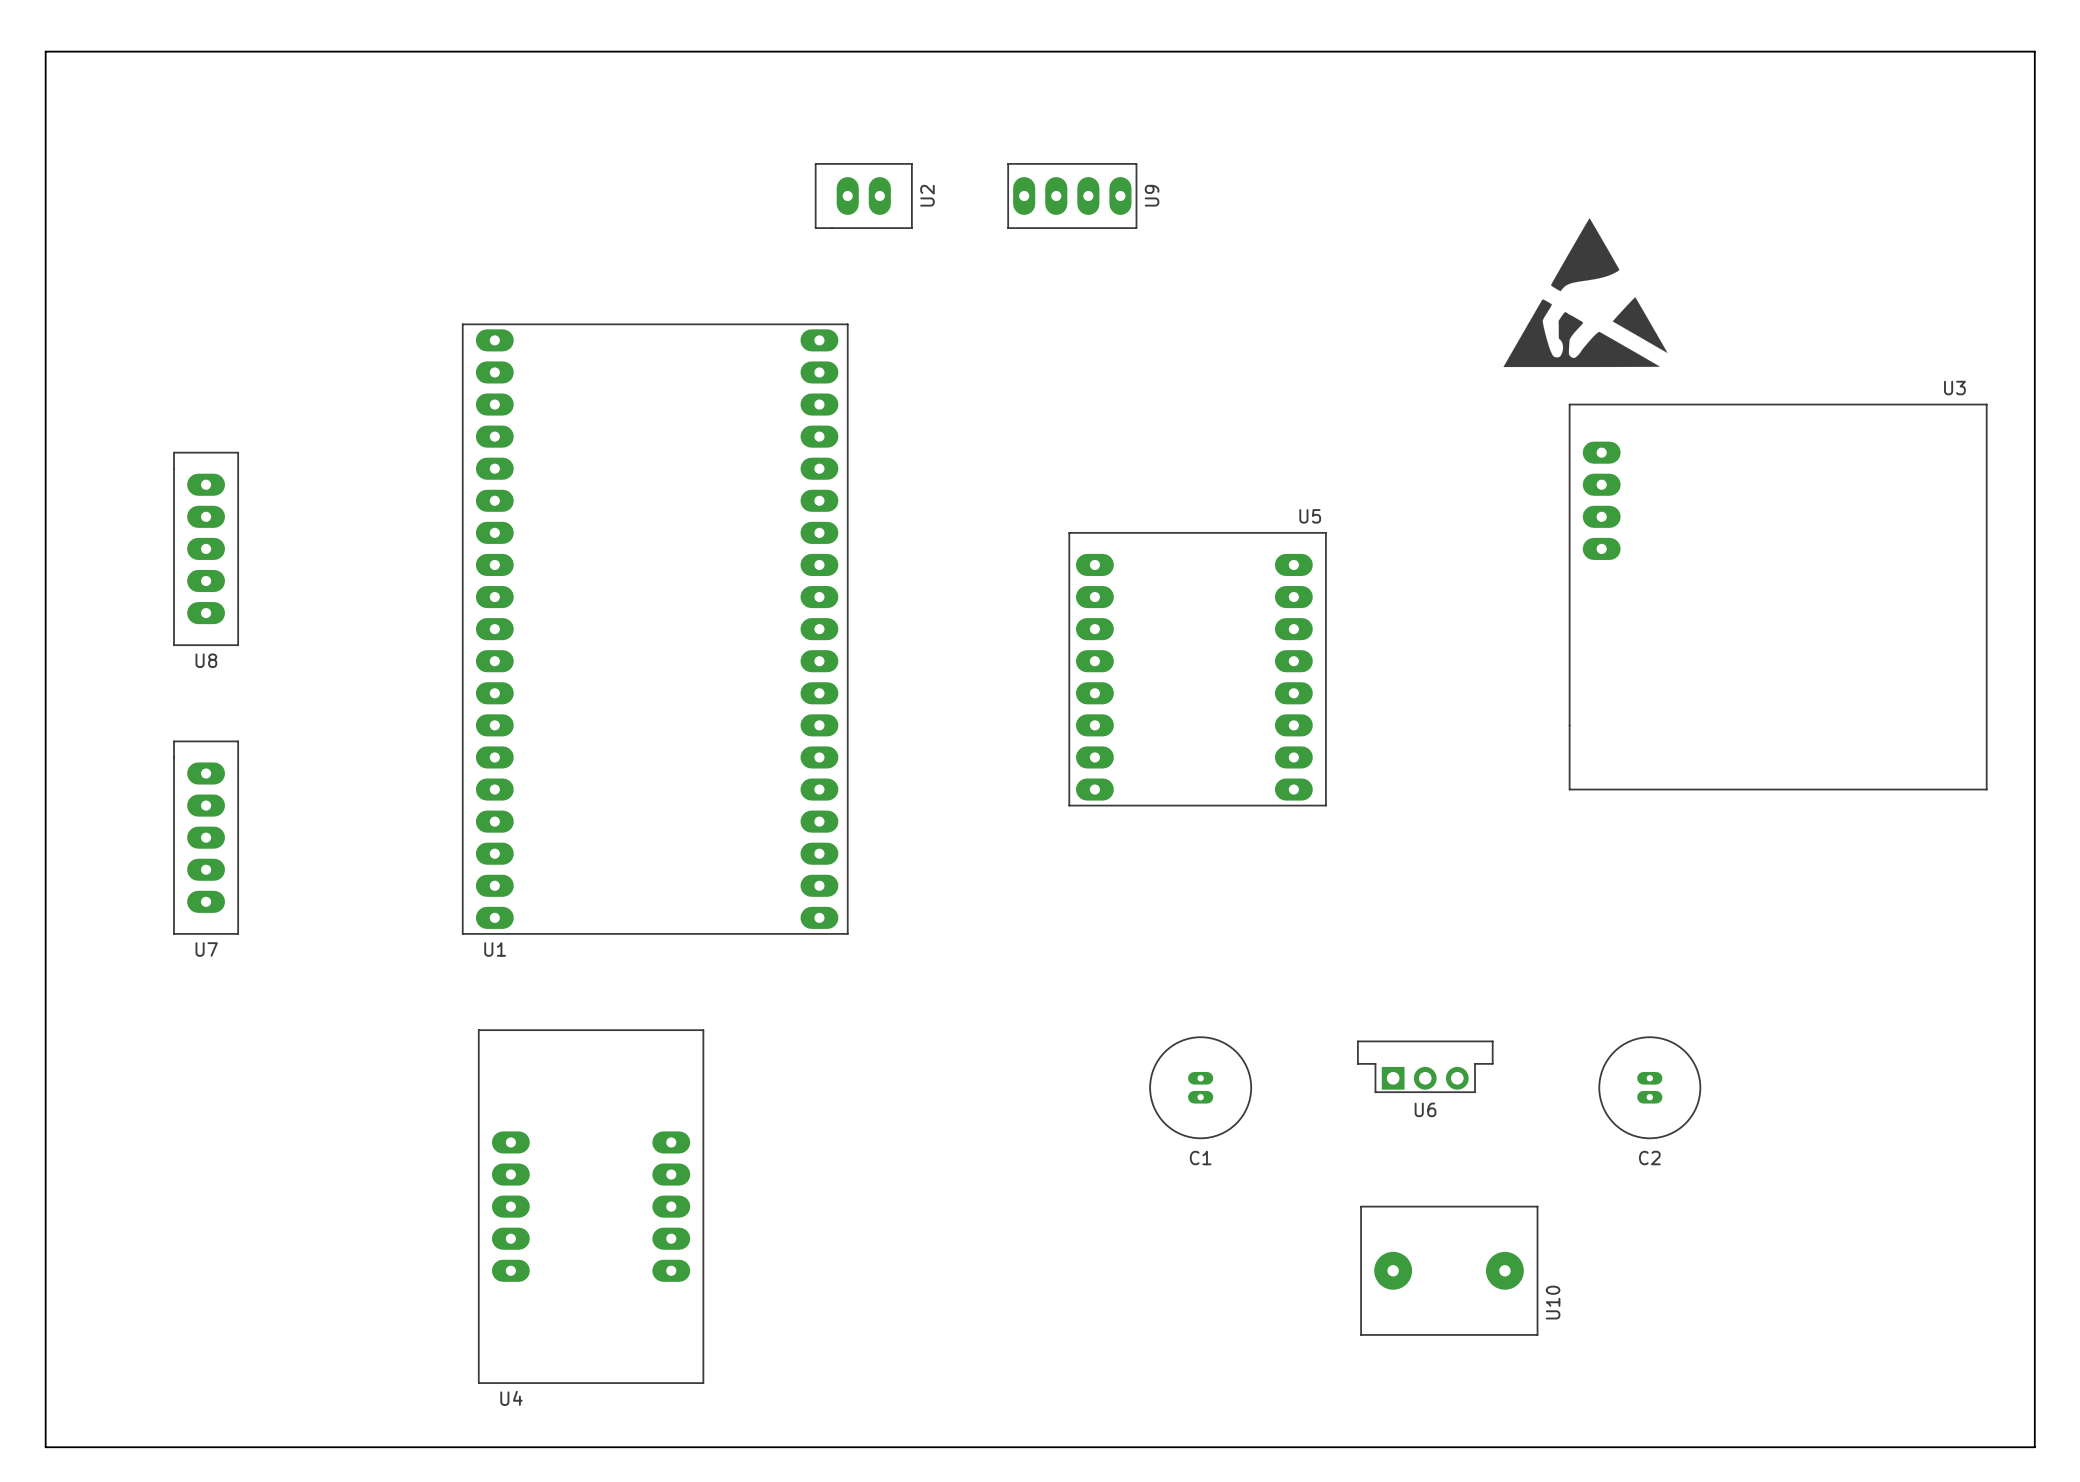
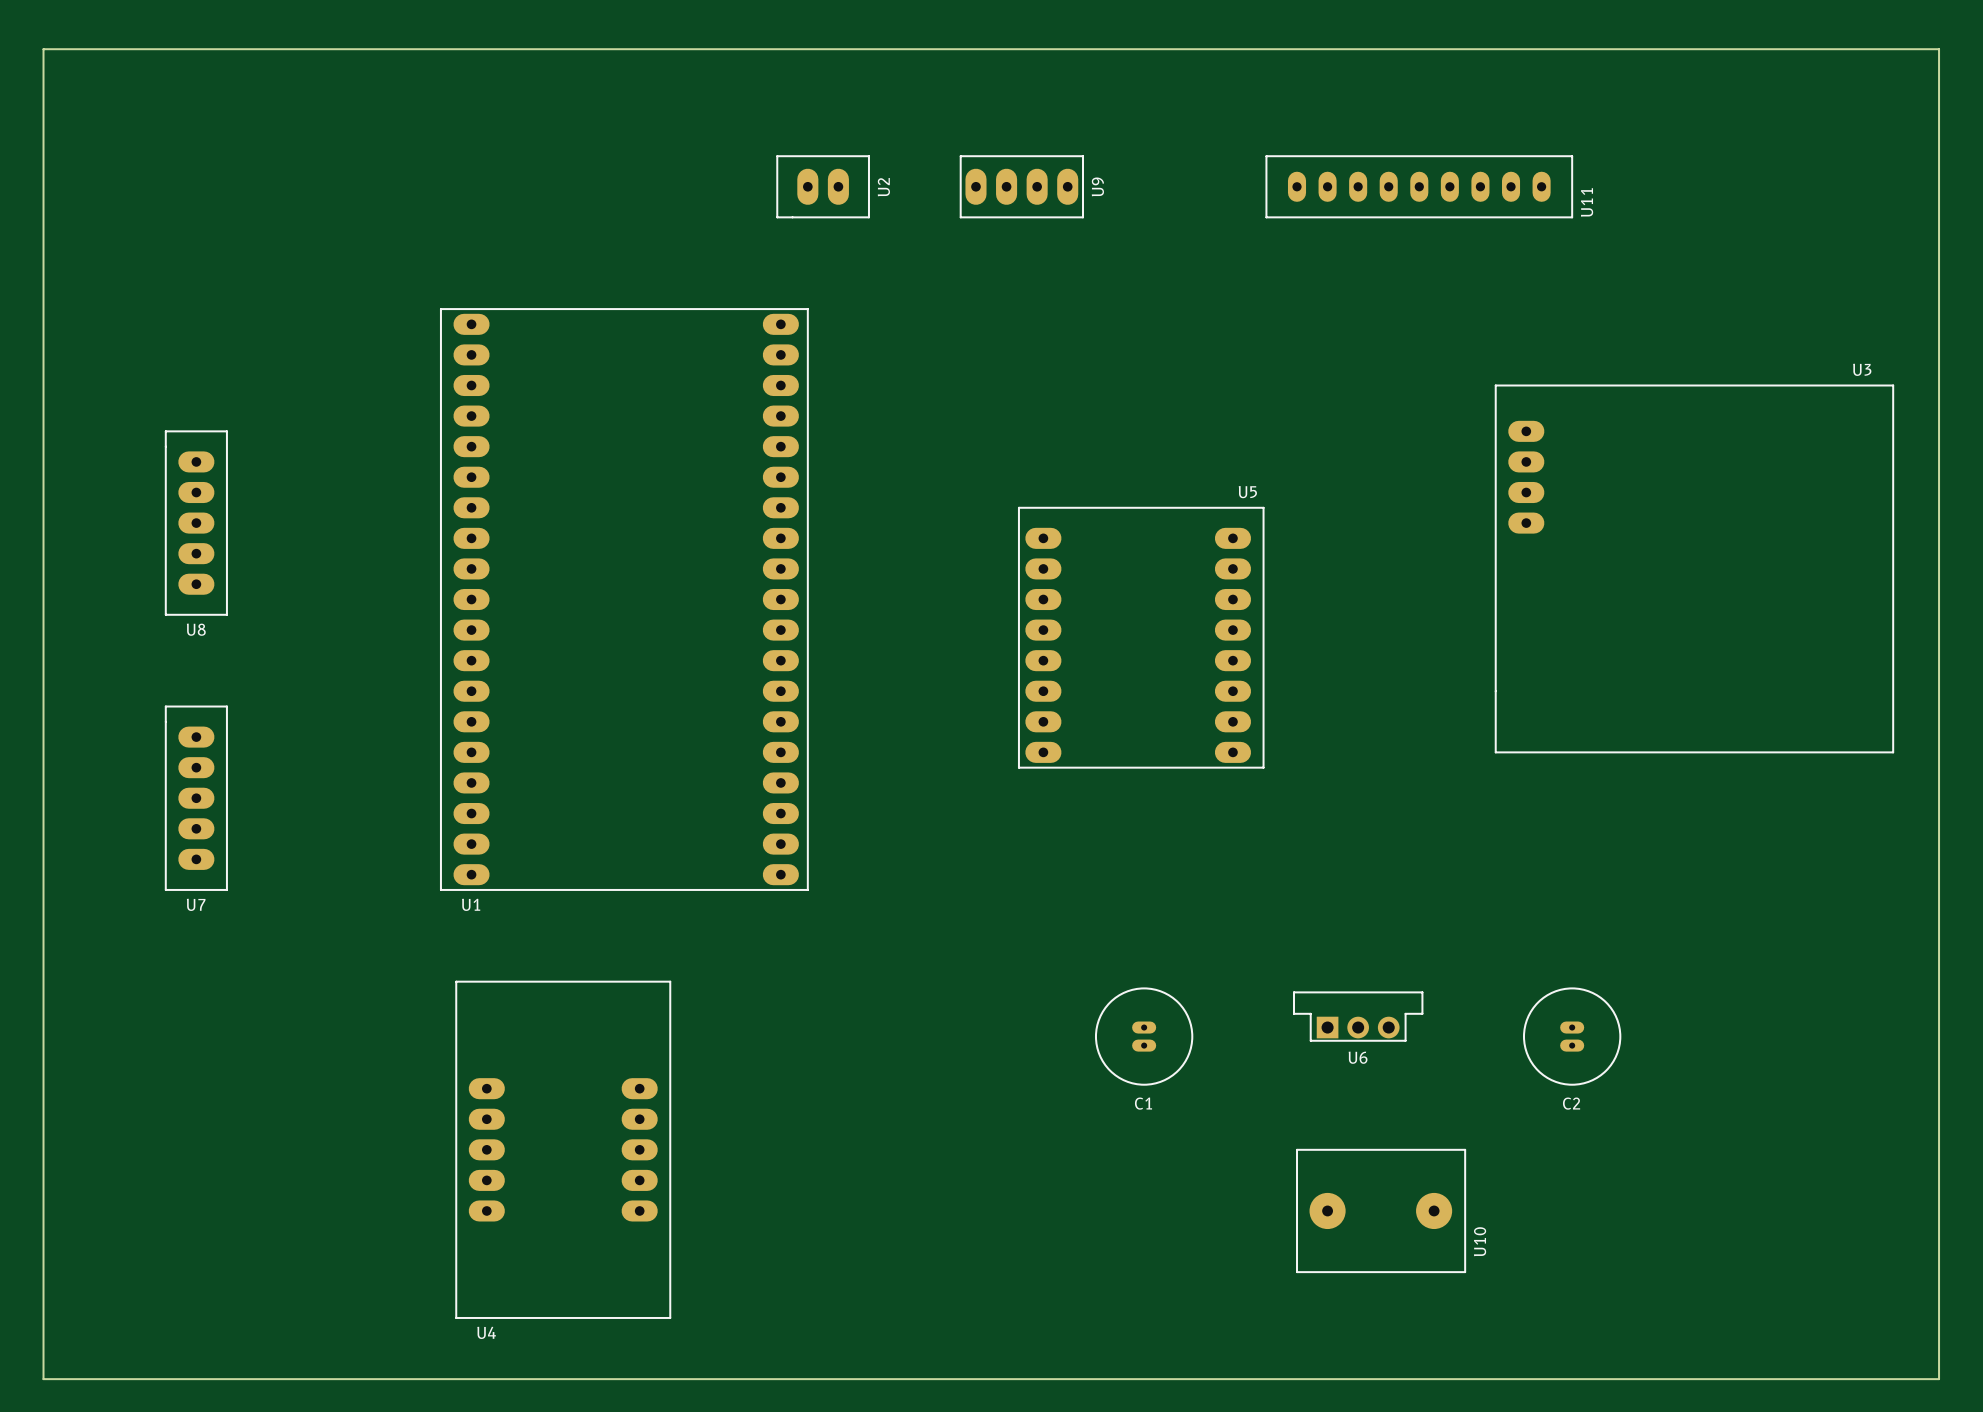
U11: none -> (1419, 186)
drawing: [1503, 218, 1668, 368] -> none

